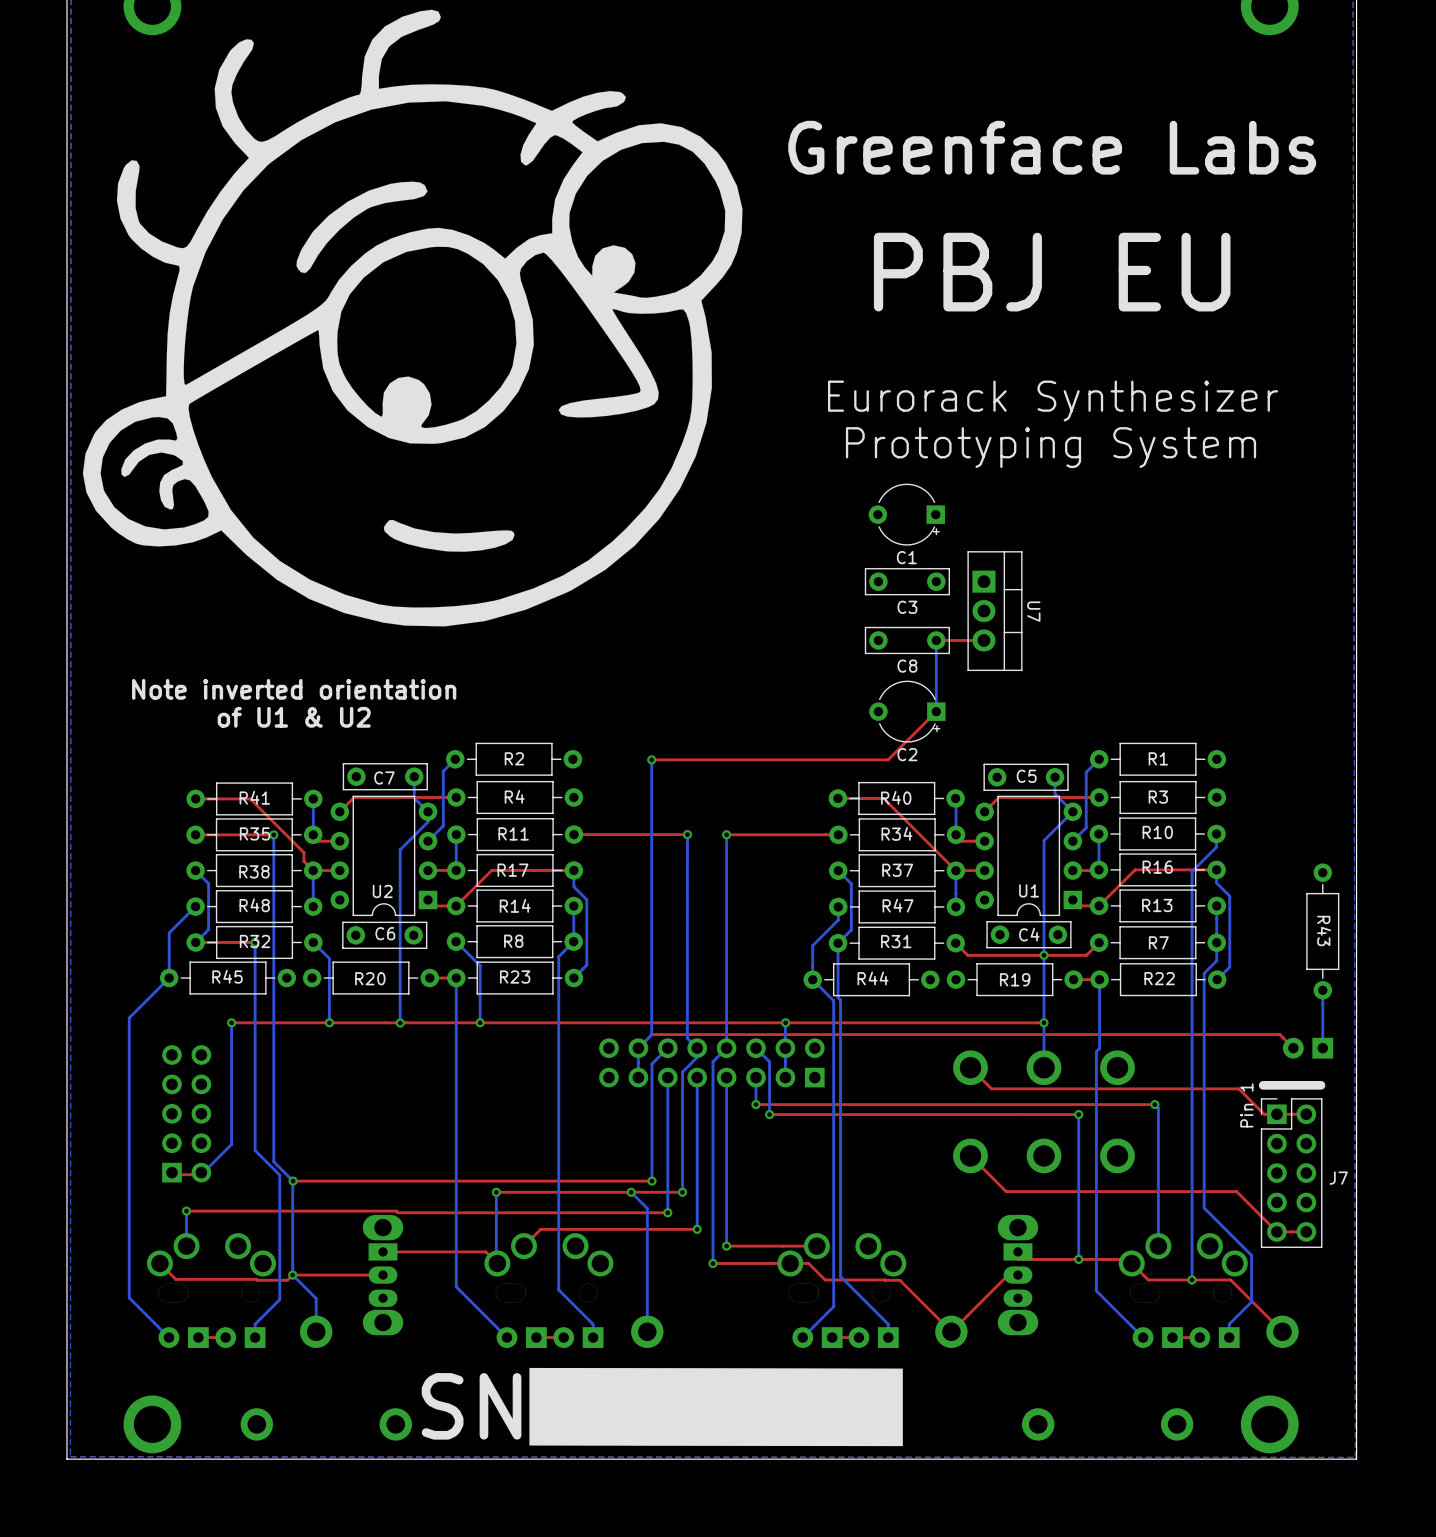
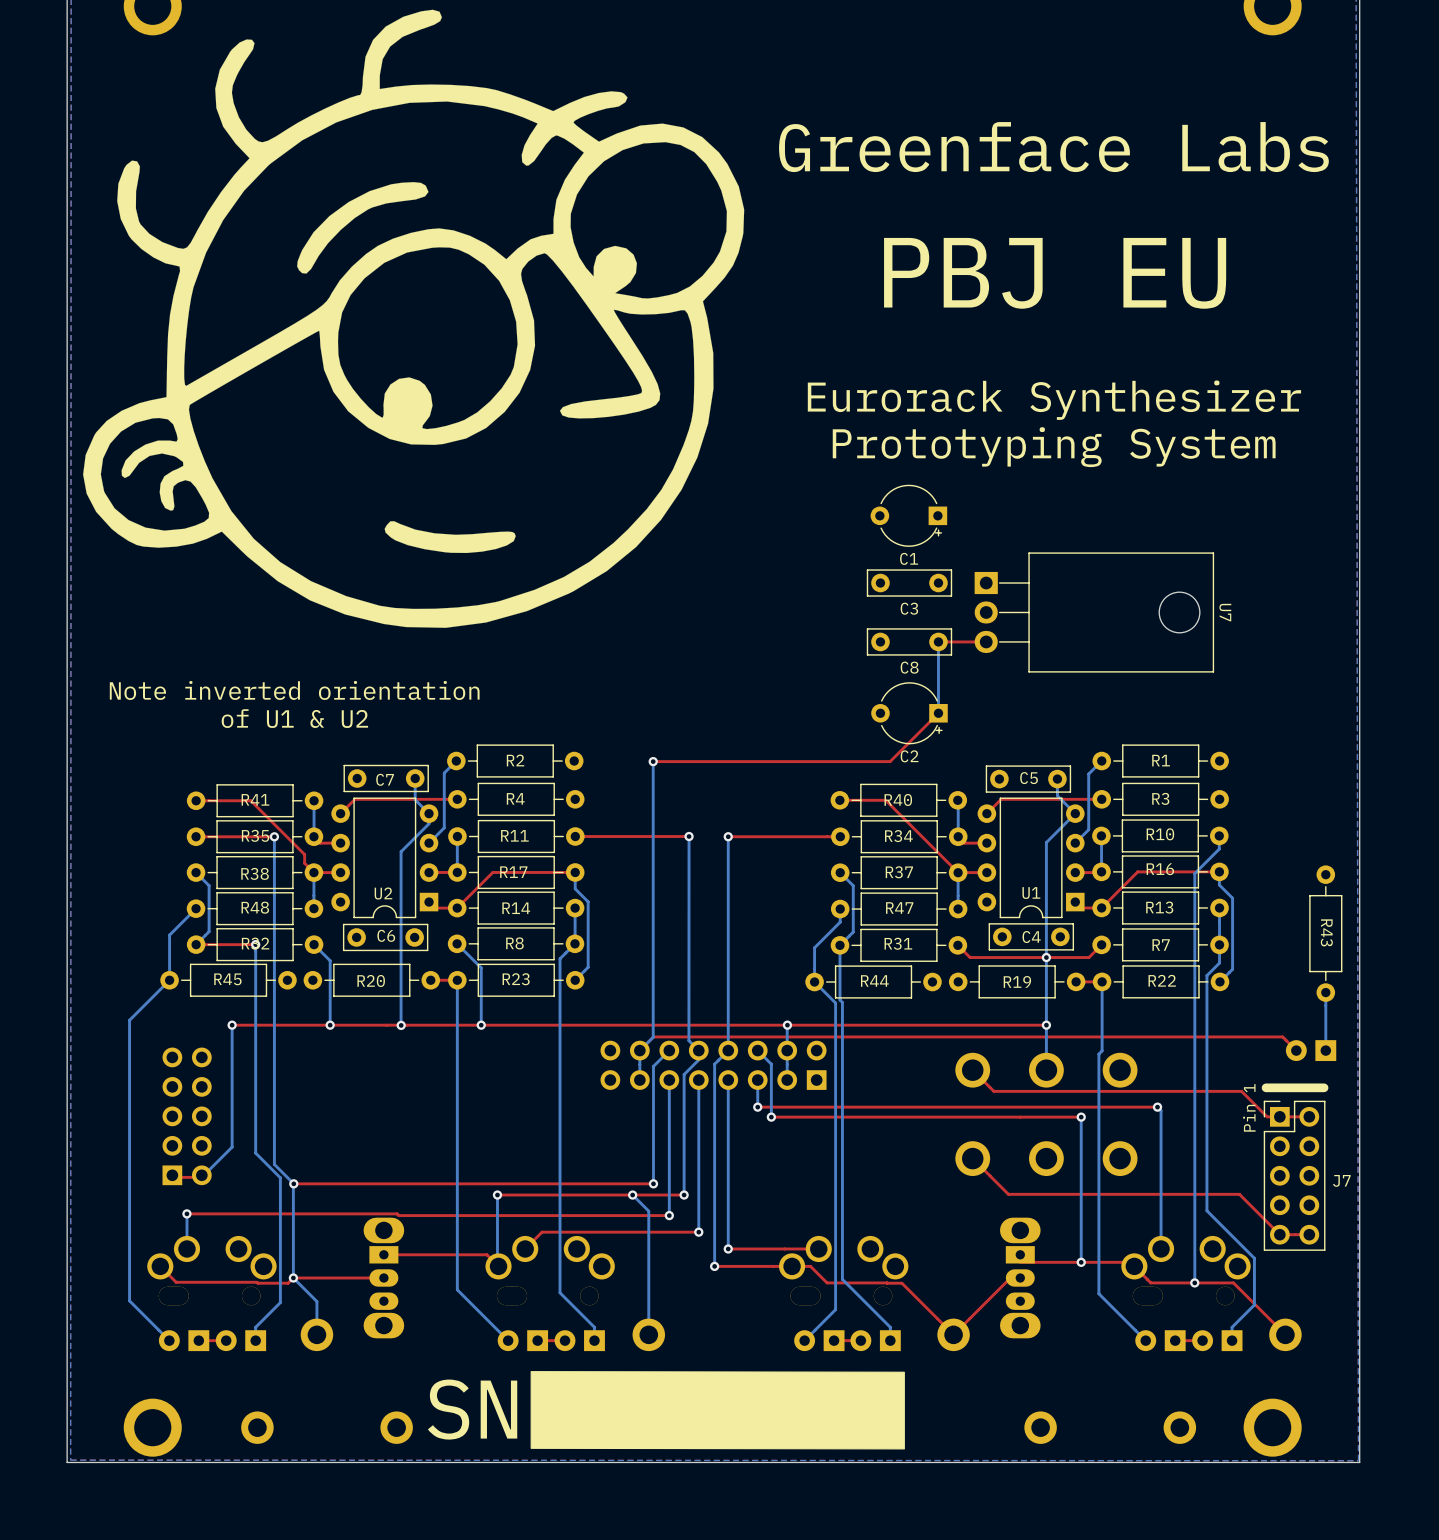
U7 footprint: [967, 551, 1023, 672] -> [974, 552, 1215, 673]
U7 name position: U7 (1033, 611) -> U7 (1225, 612)

